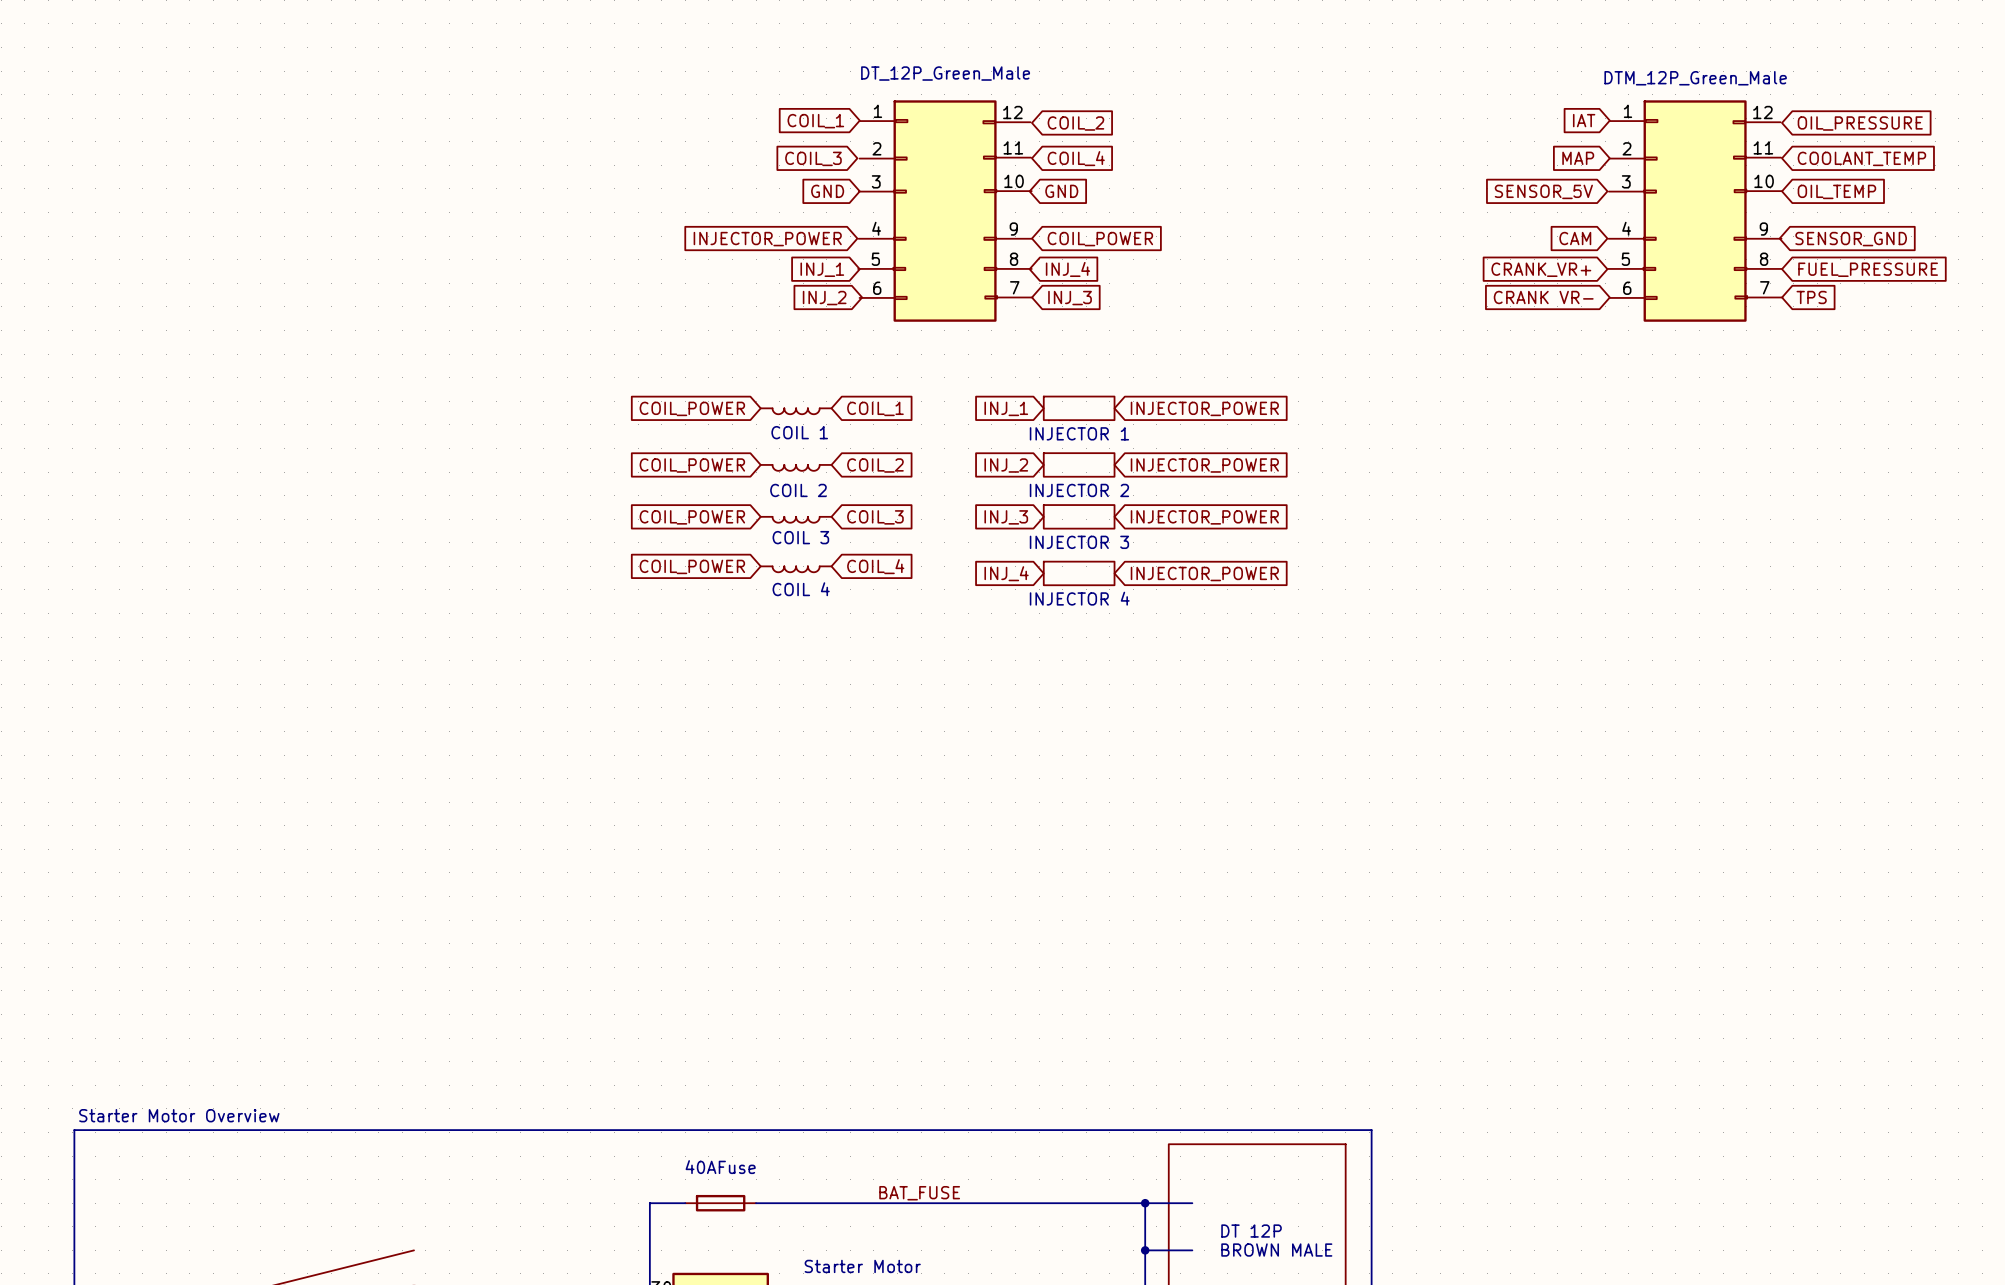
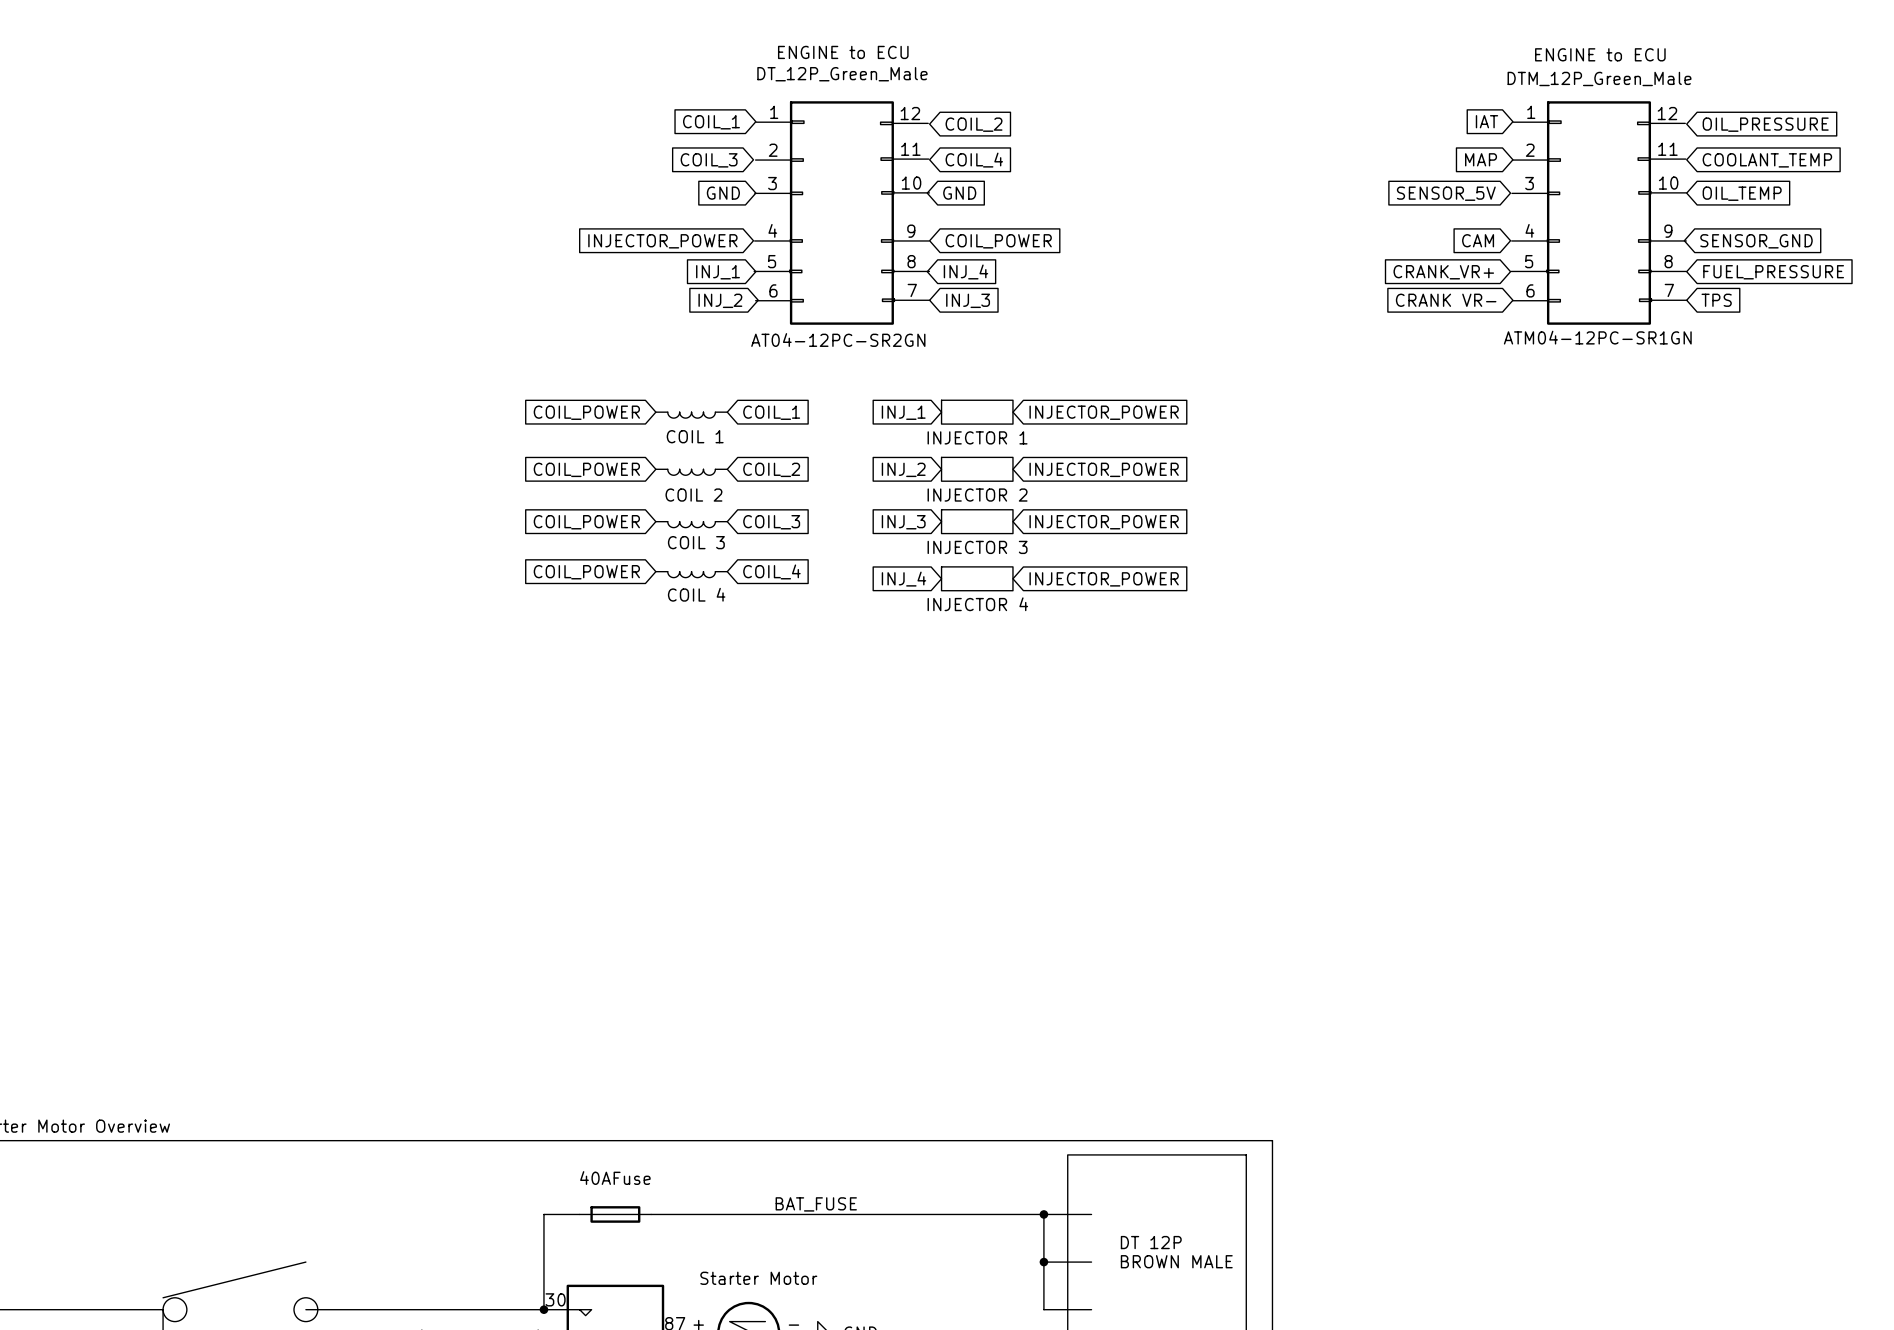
text: none -> ENGINE to ECU (843, 52)
text: none -> ENGINE to ECU (1600, 54)
part text: none -> ATM04-12PC-SR1GN (1597, 337)
part text: none -> AT04-12PC-SR2GN (838, 340)

